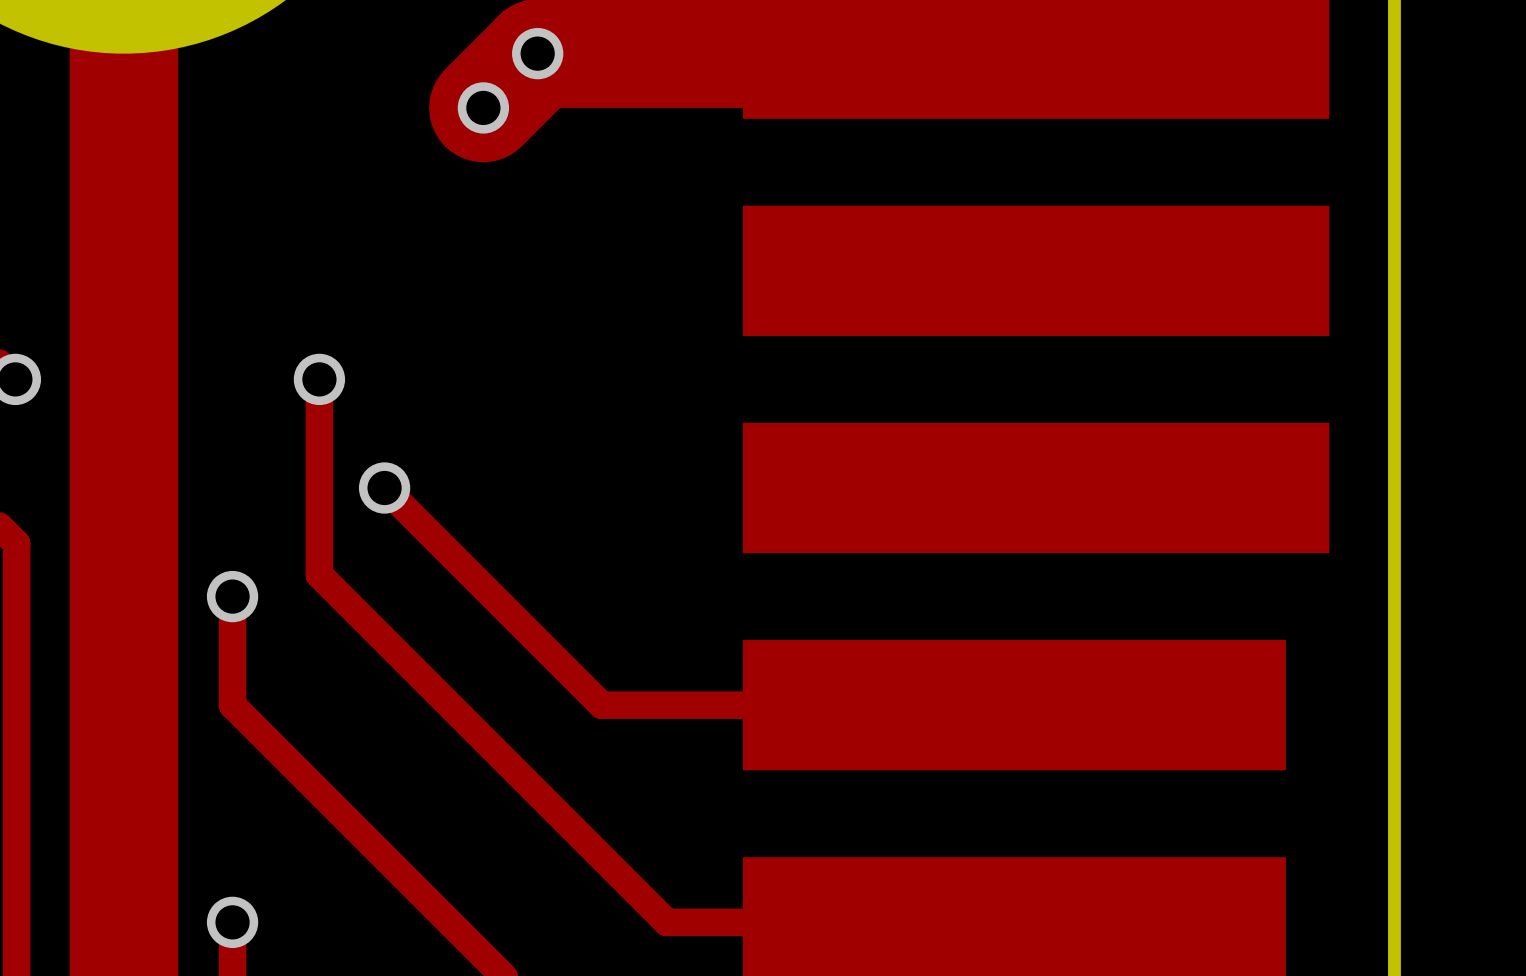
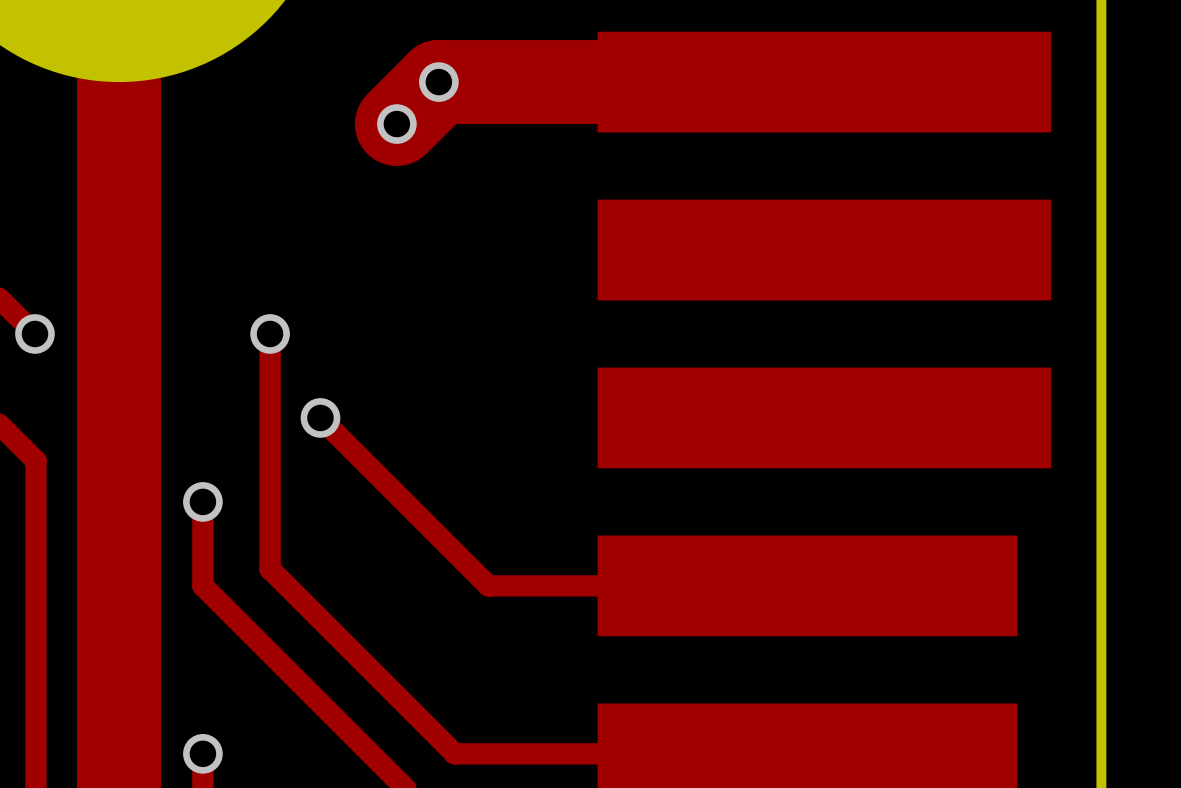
track: (319, 574) (666, 922) -> (270, 485) (270, 569) (454, 753) (538, 753)

